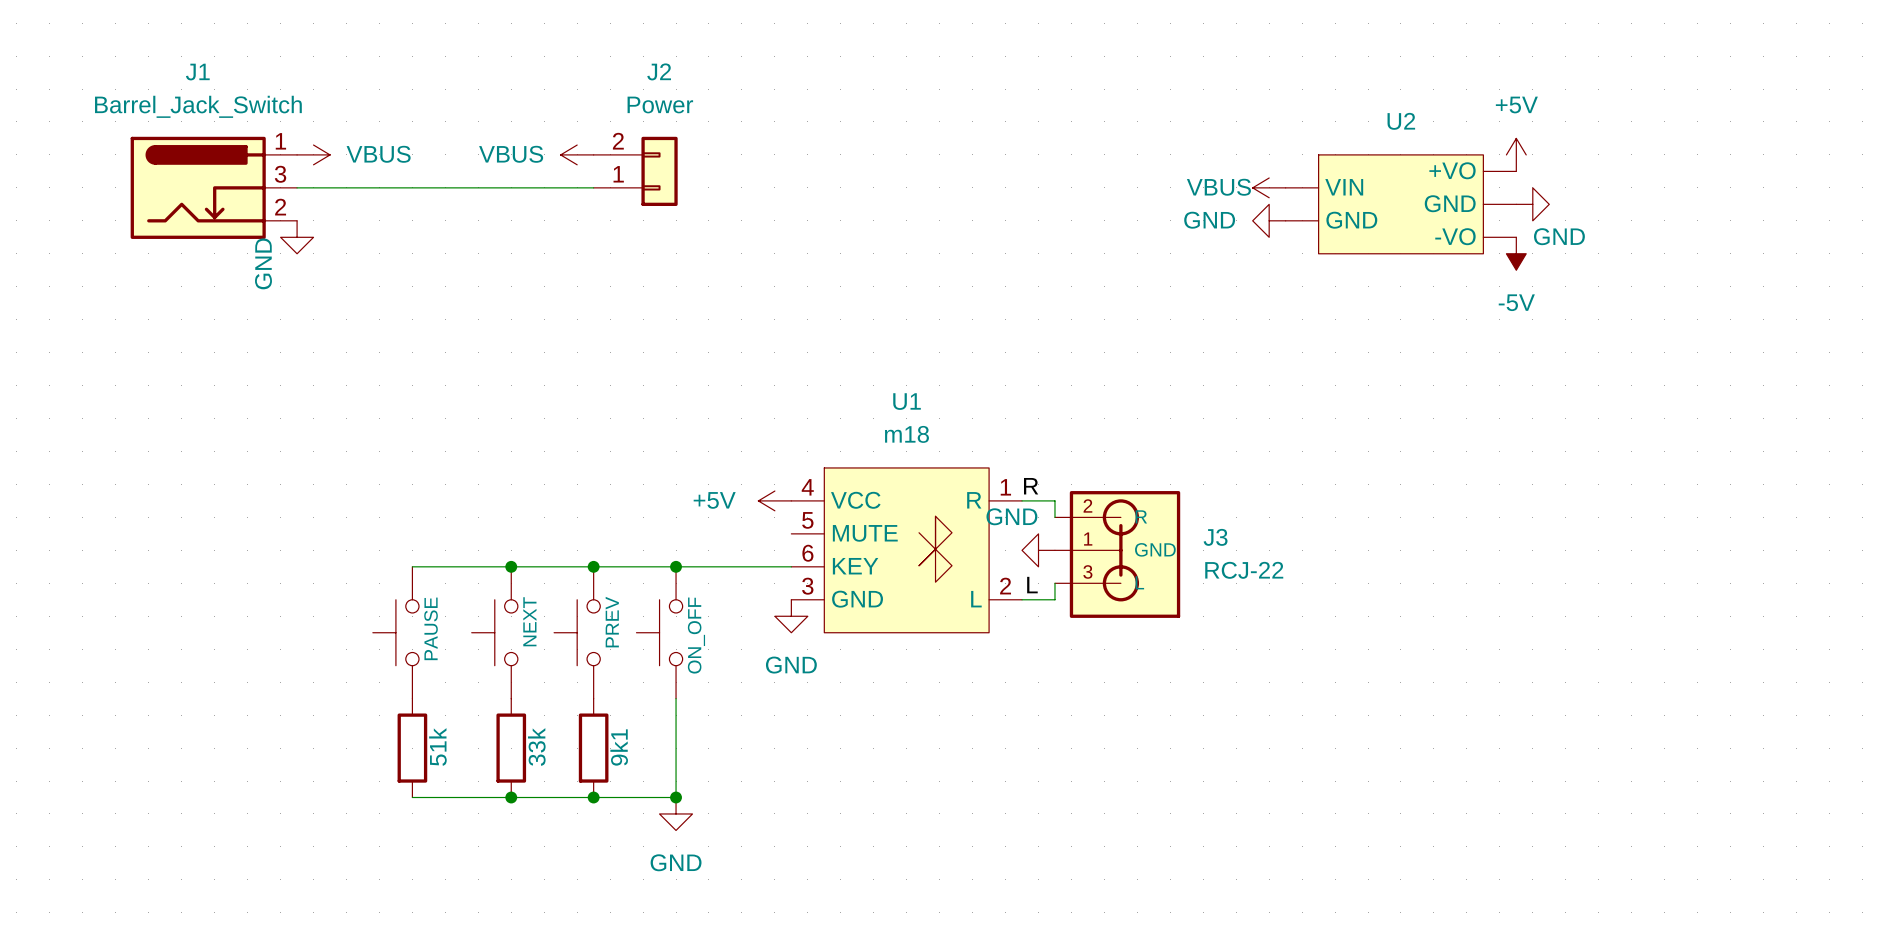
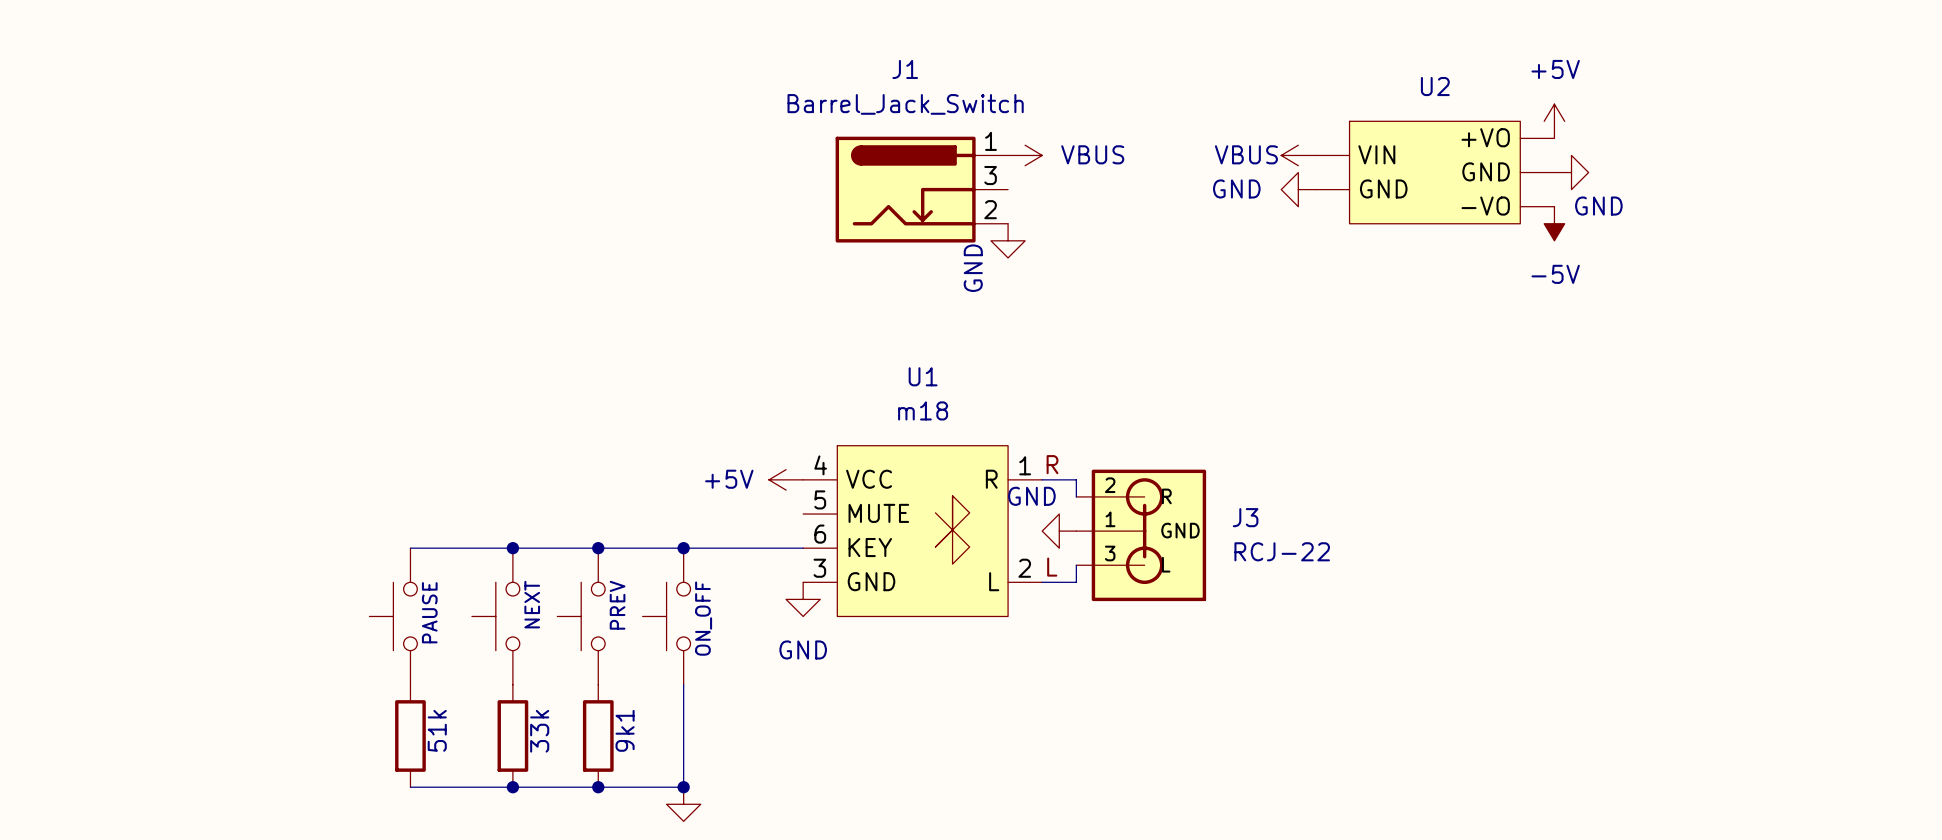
J1 symbol: [130, 136, 298, 239] -> [835, 136, 1009, 243]
power symbol: VBUS (313, 154) -> none
power symbol: VBUS (577, 154) -> none
J2: Power (635, 171) -> none
wire: (297, 187) (593, 187) -> none
power symbol: none -> VBUS (1025, 155)
power symbol: GND (297, 237) -> none
power symbol: none -> GND (1008, 240)

